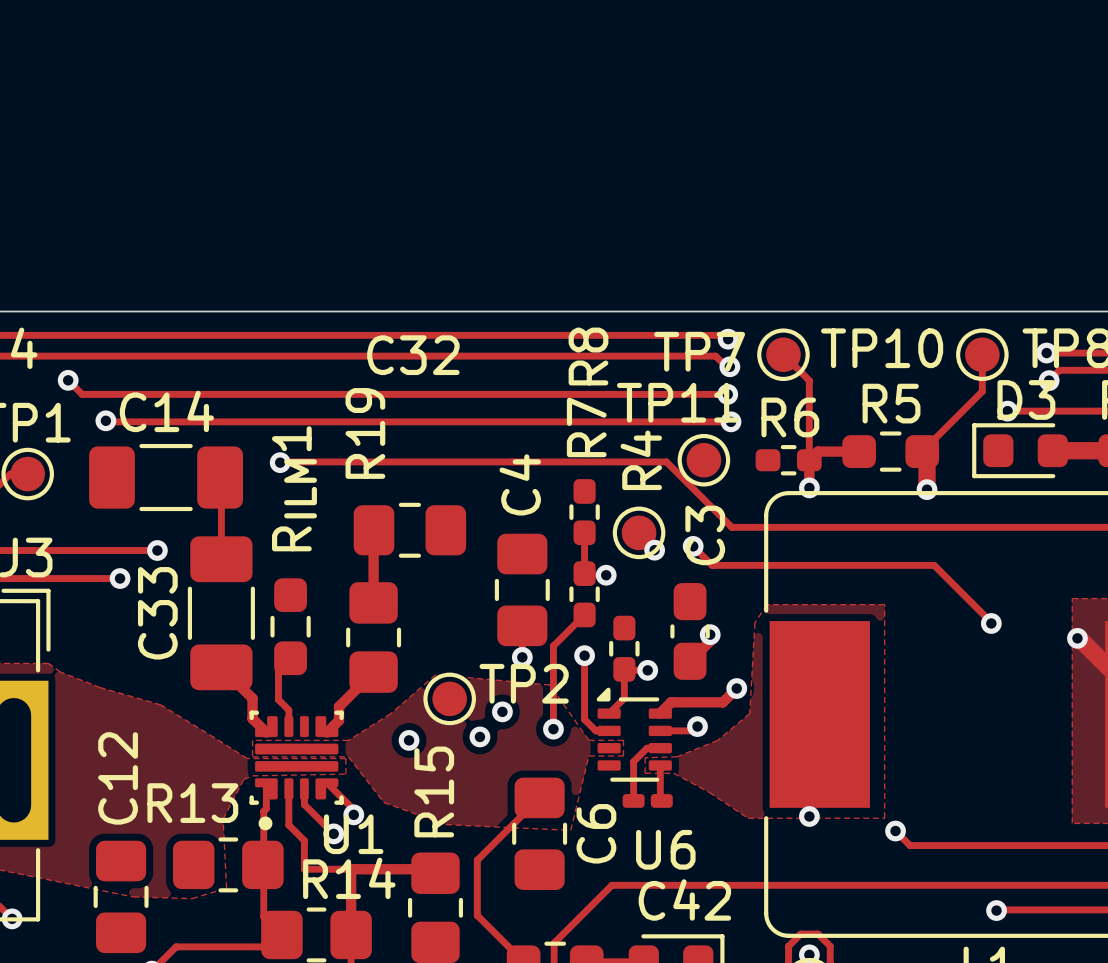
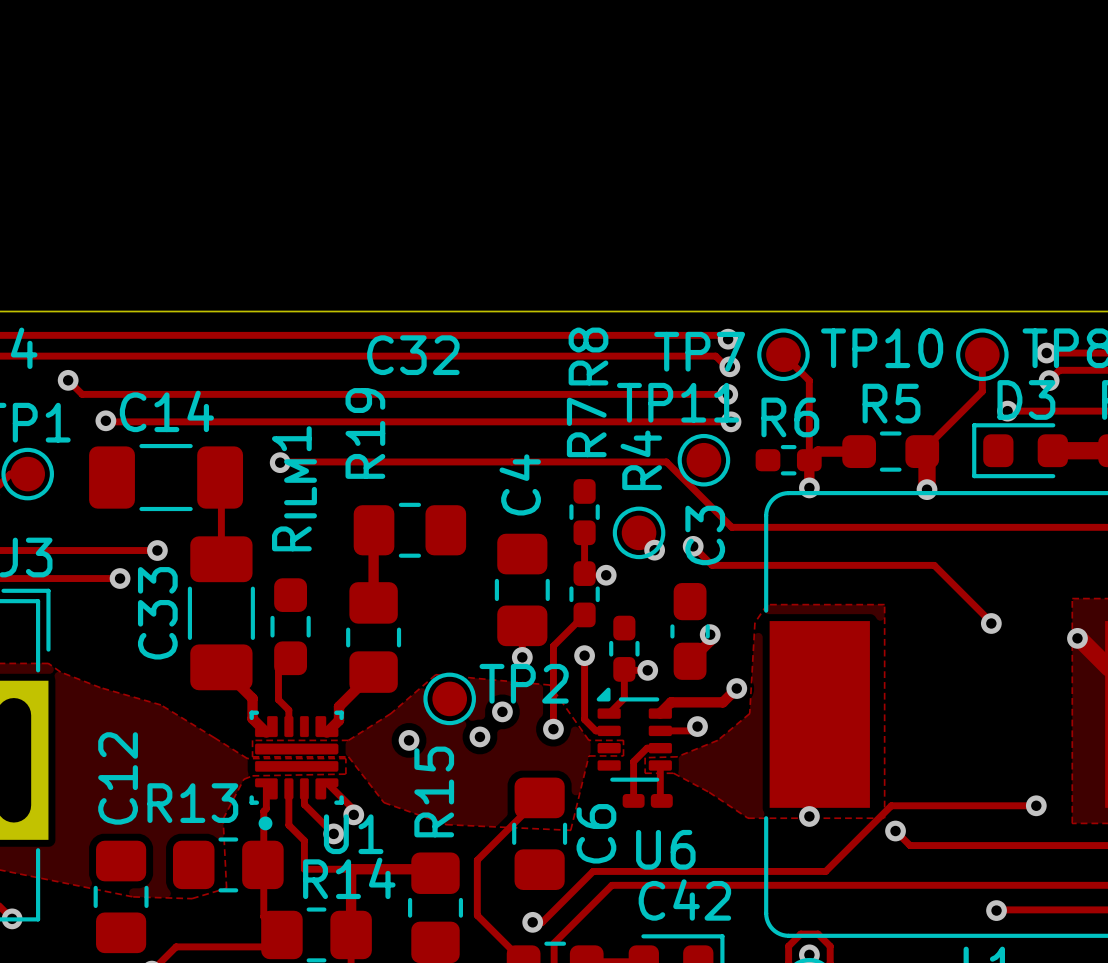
track: none -> (1036, 805) (891, 805) (825, 871) (593, 871) (542, 922) (532, 922)
via: none -> (1036, 805)
via: none -> (532, 922)

